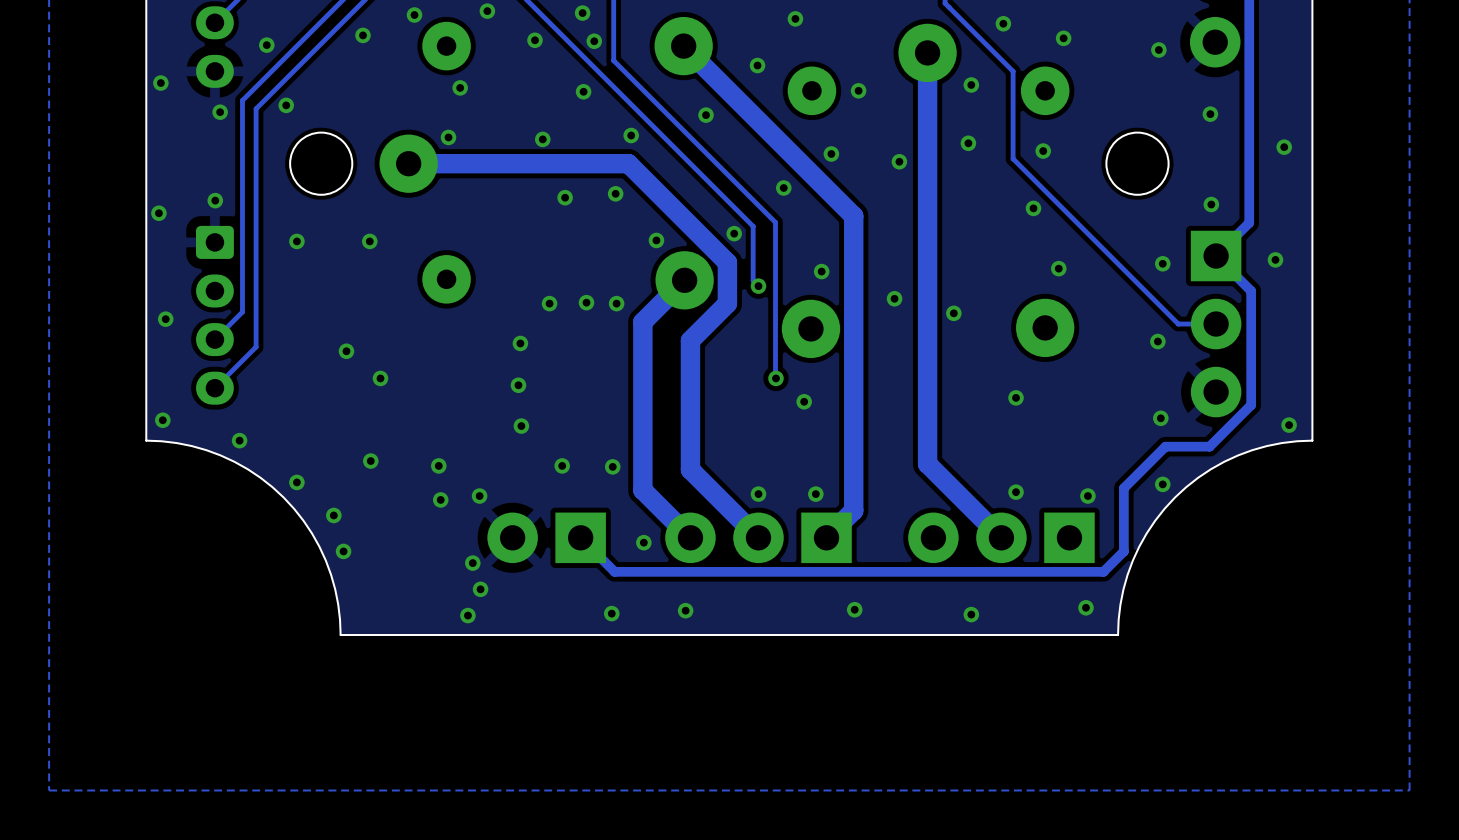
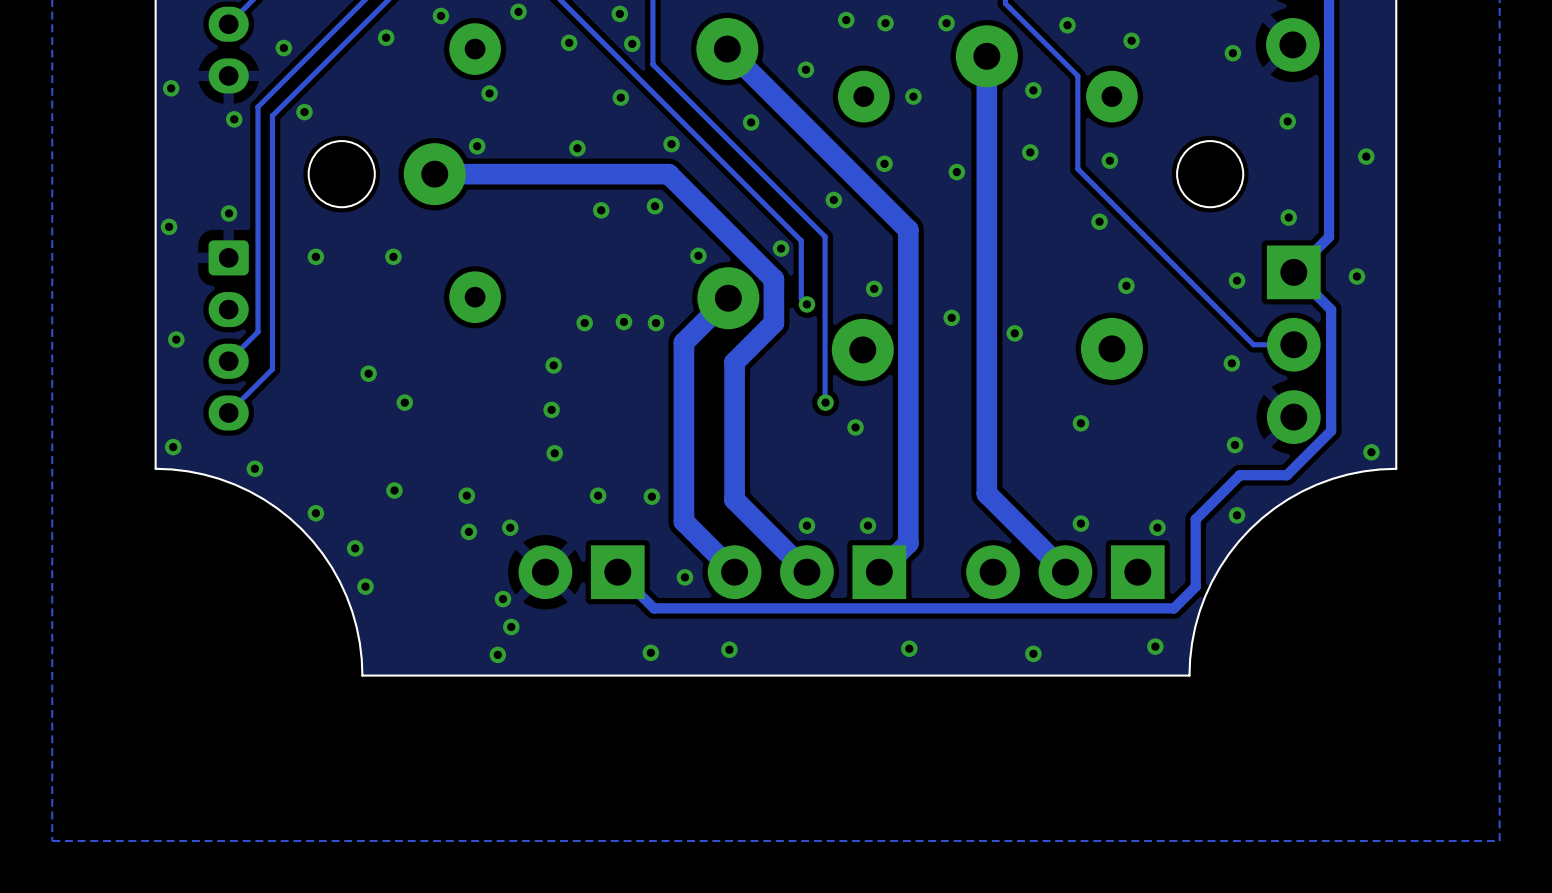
via: none -> (885, 23)
via: none -> (946, 23)

